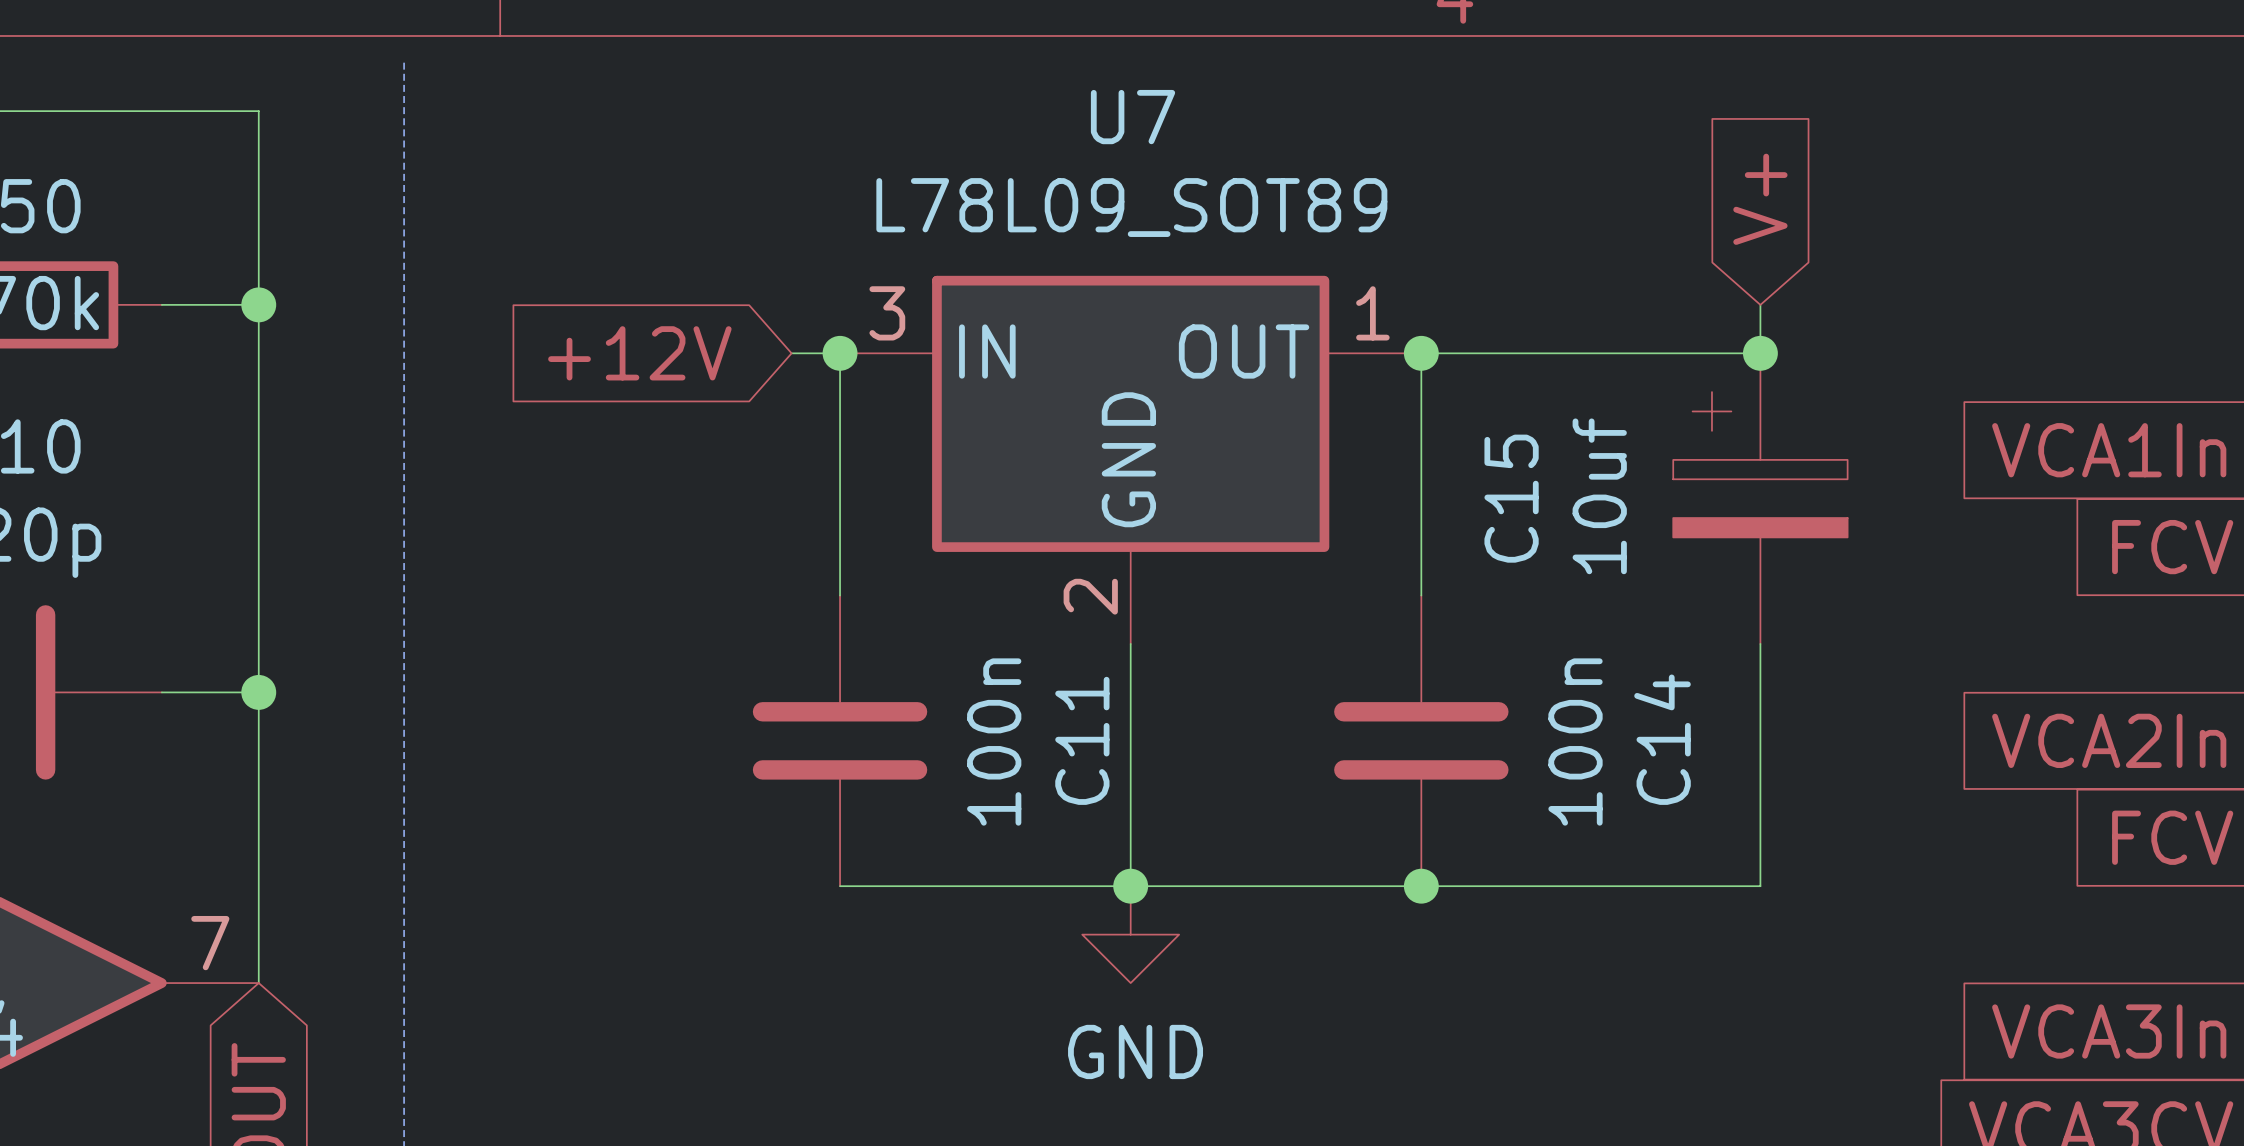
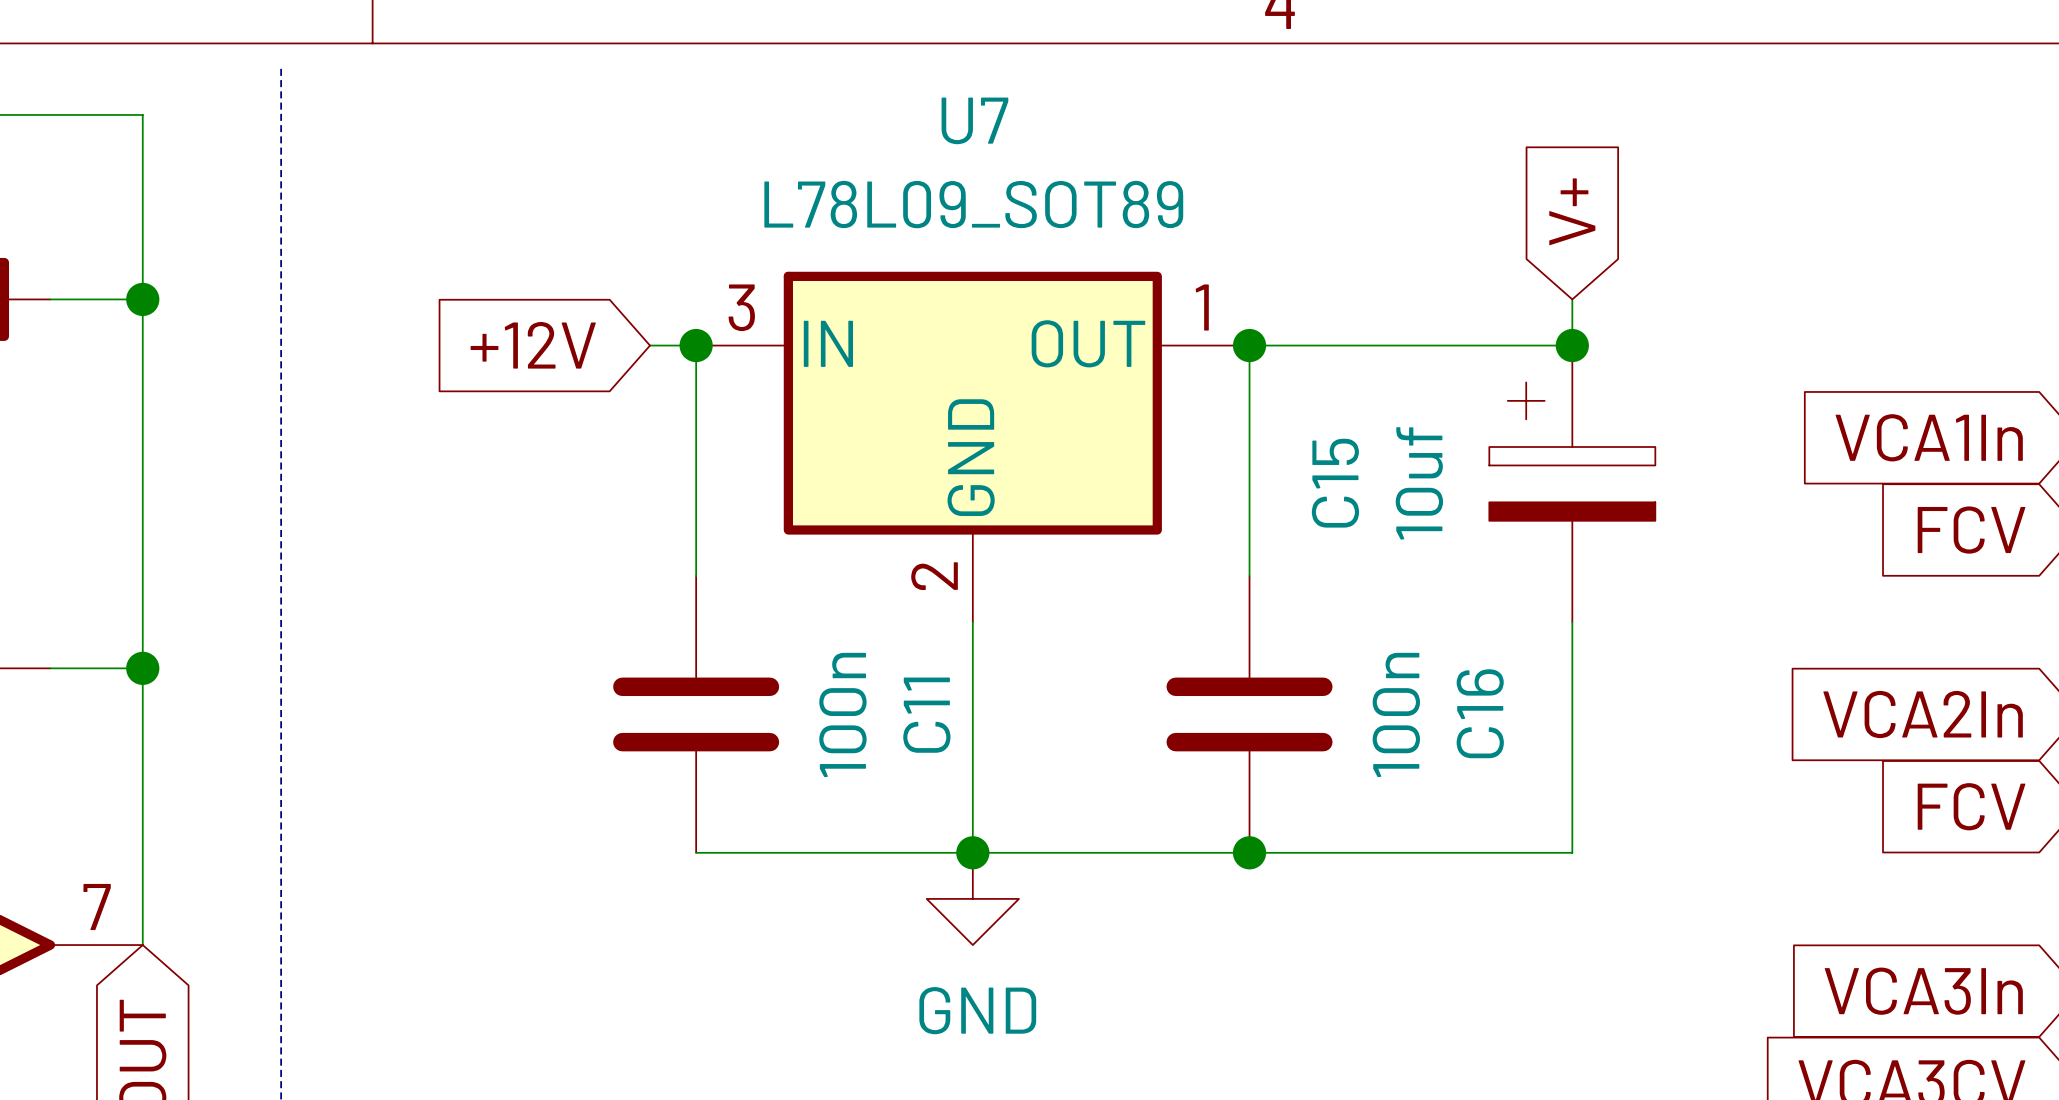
C14 name: C14 (1662, 739) -> C16 (1480, 713)

